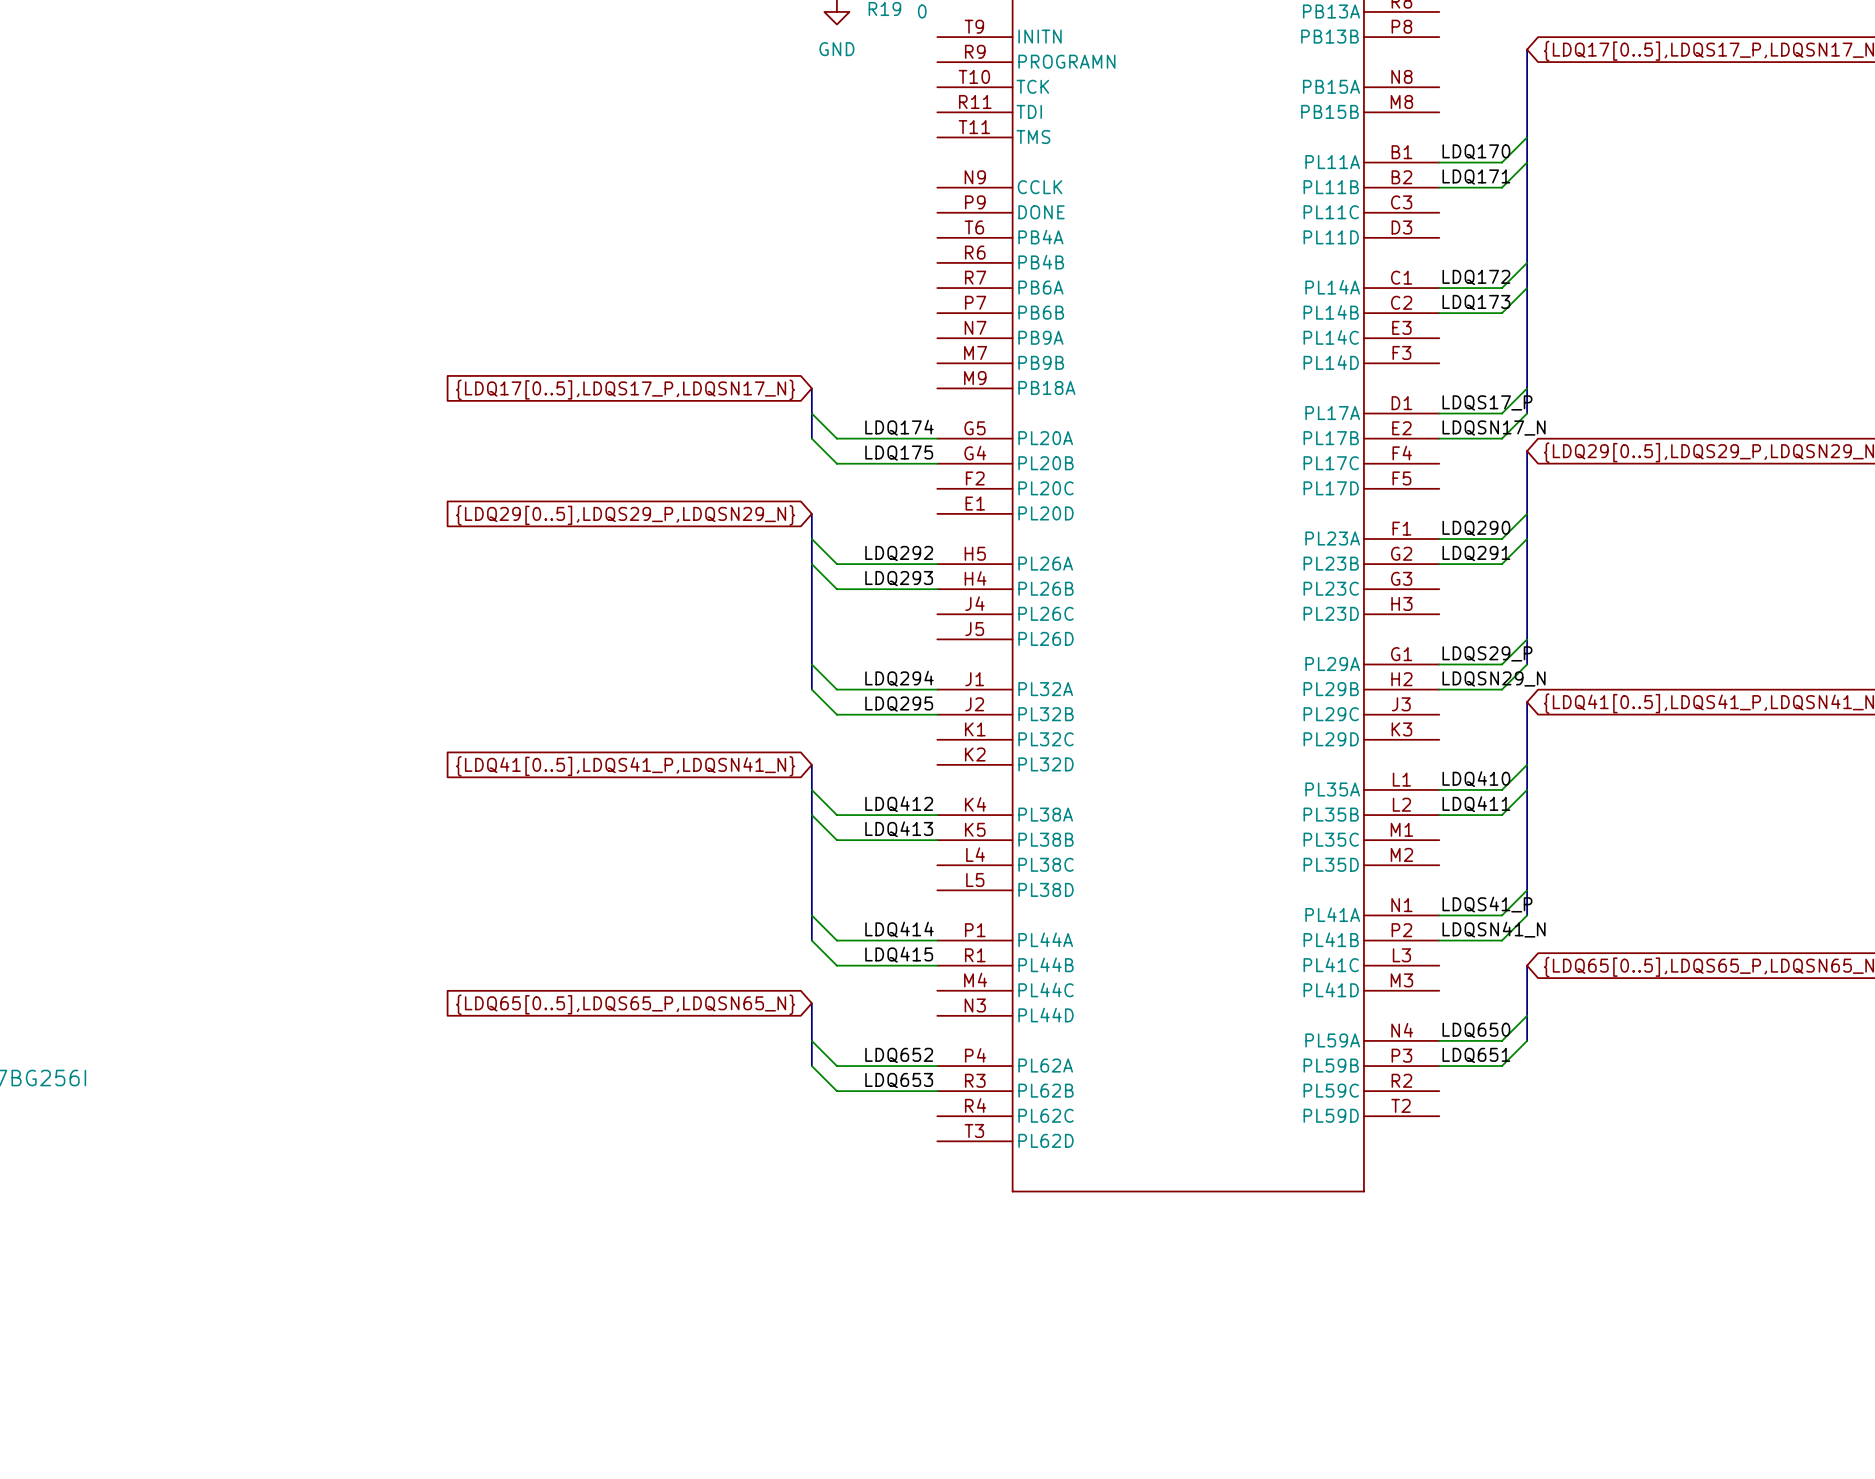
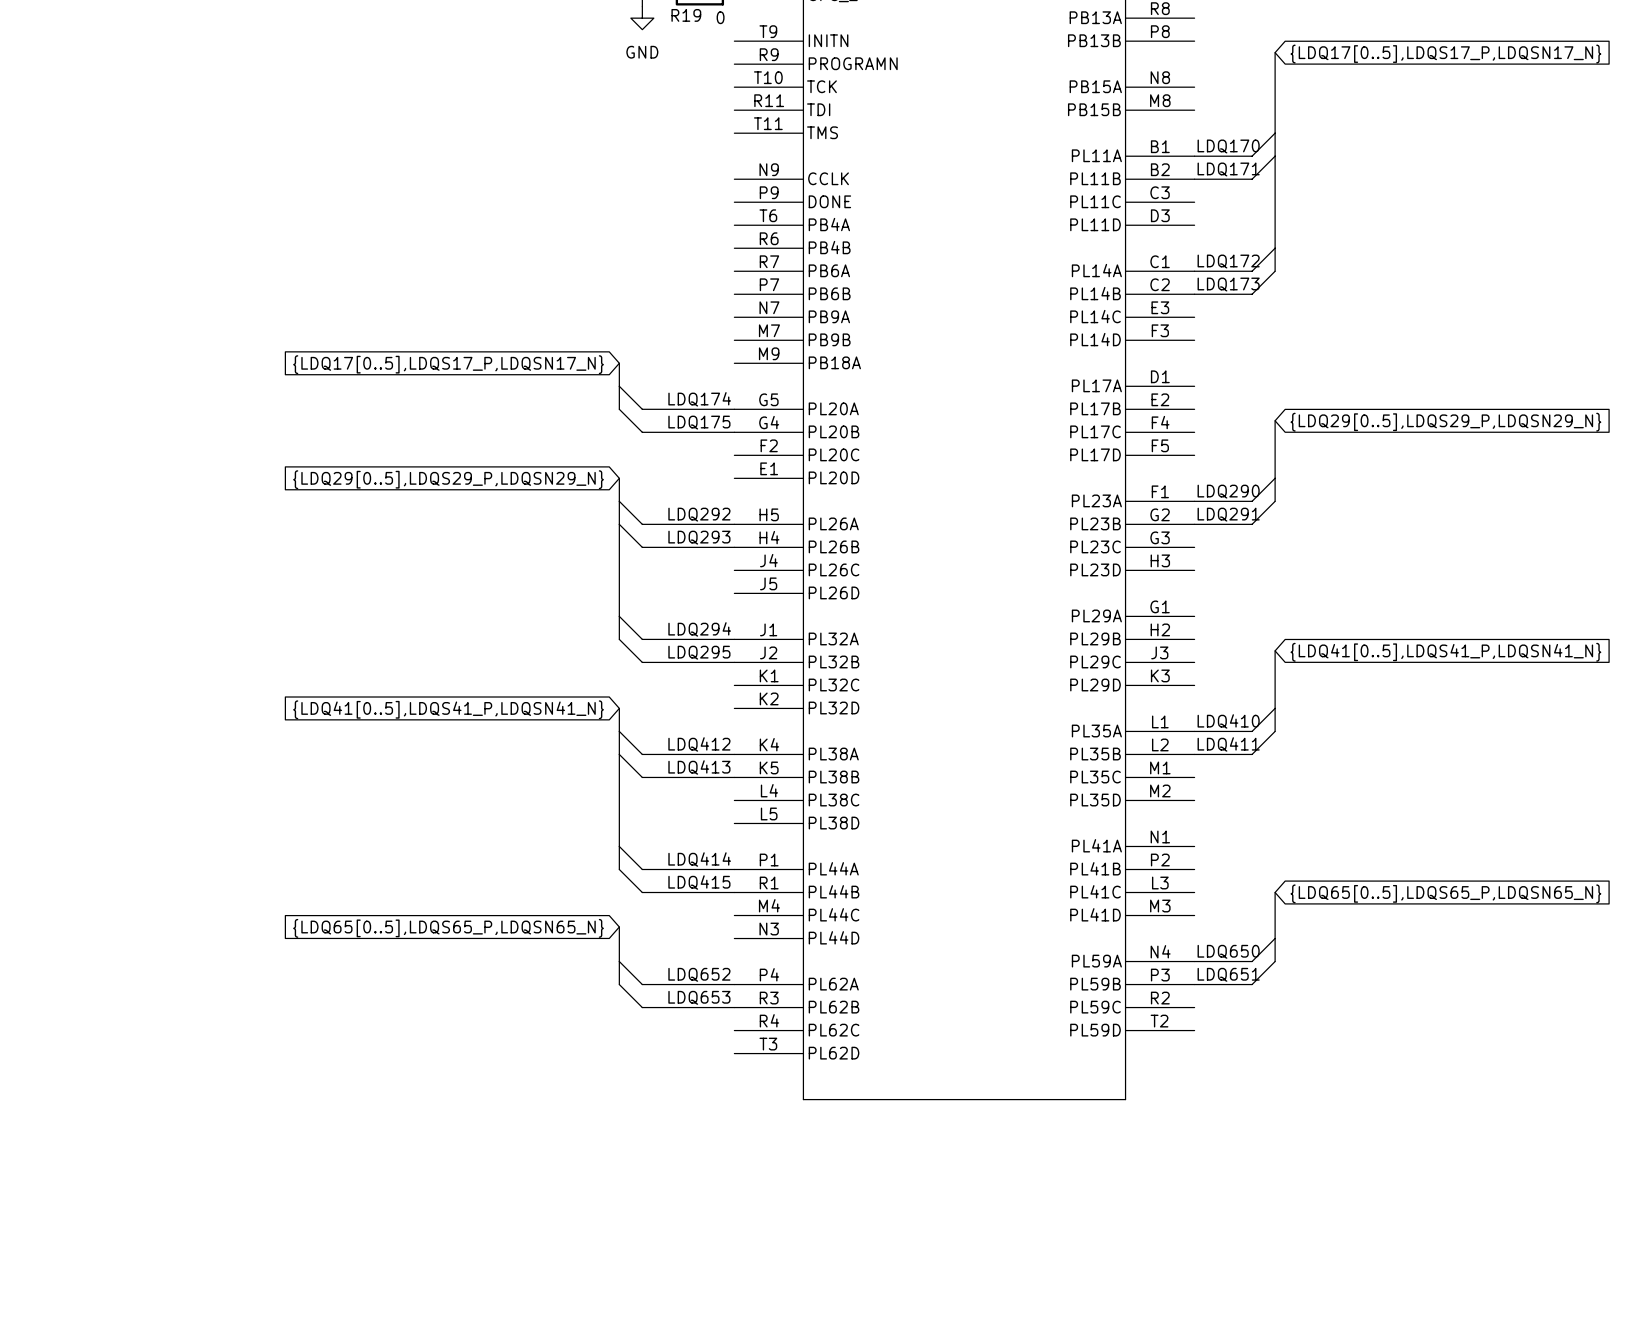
bus: (1527, 288) (1527, 413) -> none
wire: (1527, 388) (1502, 413) (1439, 413) -> none
label: LDQS17_P (1487, 402) -> none
wire: (1527, 413) (1502, 438) (1439, 438) -> none
label: LDQSN17_N (1494, 428) -> none
bus: (1527, 539) (1527, 664) -> none
wire: (1527, 639) (1502, 664) (1439, 664) -> none
label: LDQS29_P (1487, 653) -> none
wire: (1527, 664) (1502, 689) (1439, 689) -> none
label: LDQSN29_N (1494, 678) -> none
bus: (1527, 789) (1527, 915) -> none
wire: (1527, 890) (1502, 915) (1439, 915) -> none
label: LDQS41_P (1487, 904) -> none
wire: (1527, 915) (1502, 940) (1439, 940) -> none
label: LDQSN41_N (1494, 929) -> none

